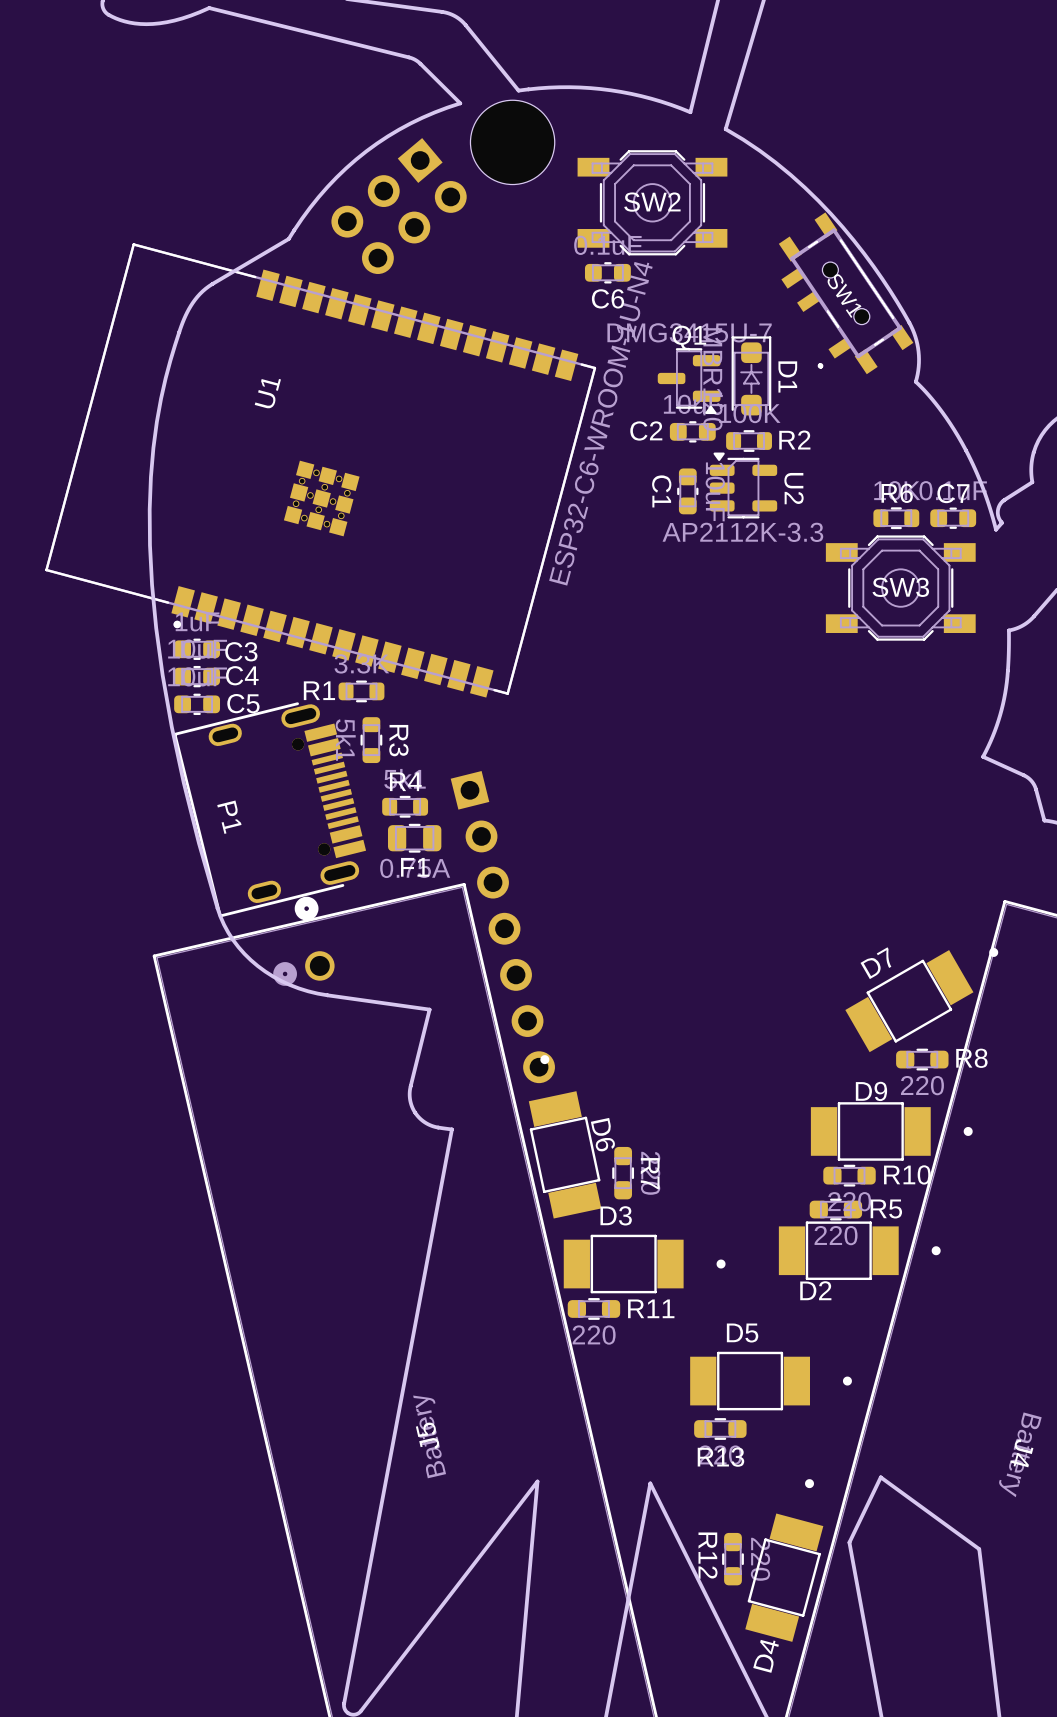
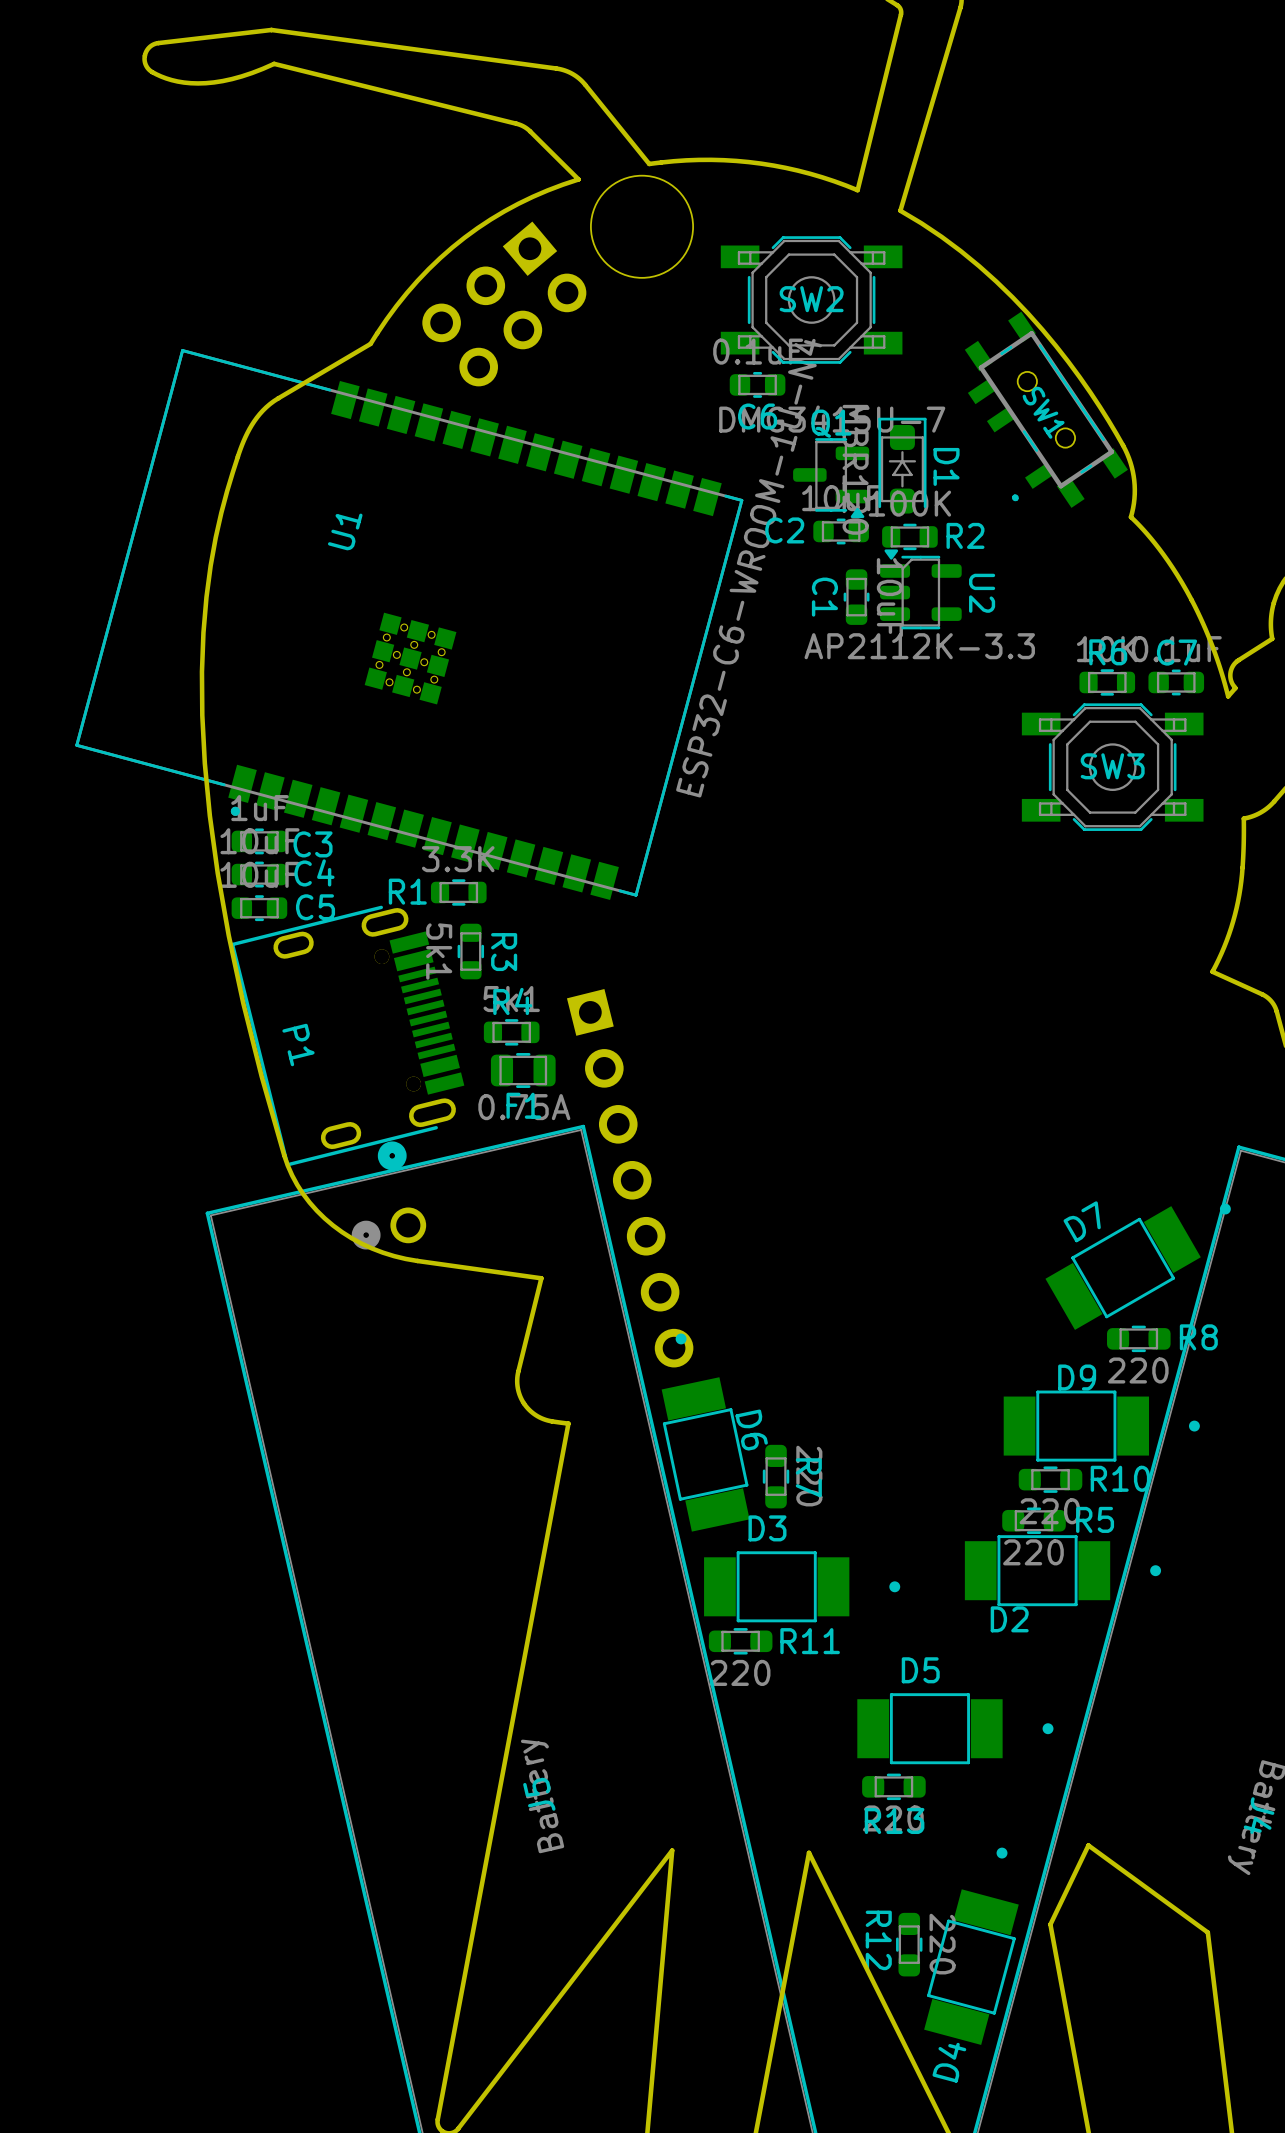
D1 position: (751, 375) -> (902, 465)
Q1 position: (689, 381) -> (831, 478)
C2 position: (692, 431) -> (841, 531)
R2 position: (749, 441) -> (909, 536)
U2 position: (743, 485) -> (920, 589)
C1 position: (687, 491) -> (856, 597)

